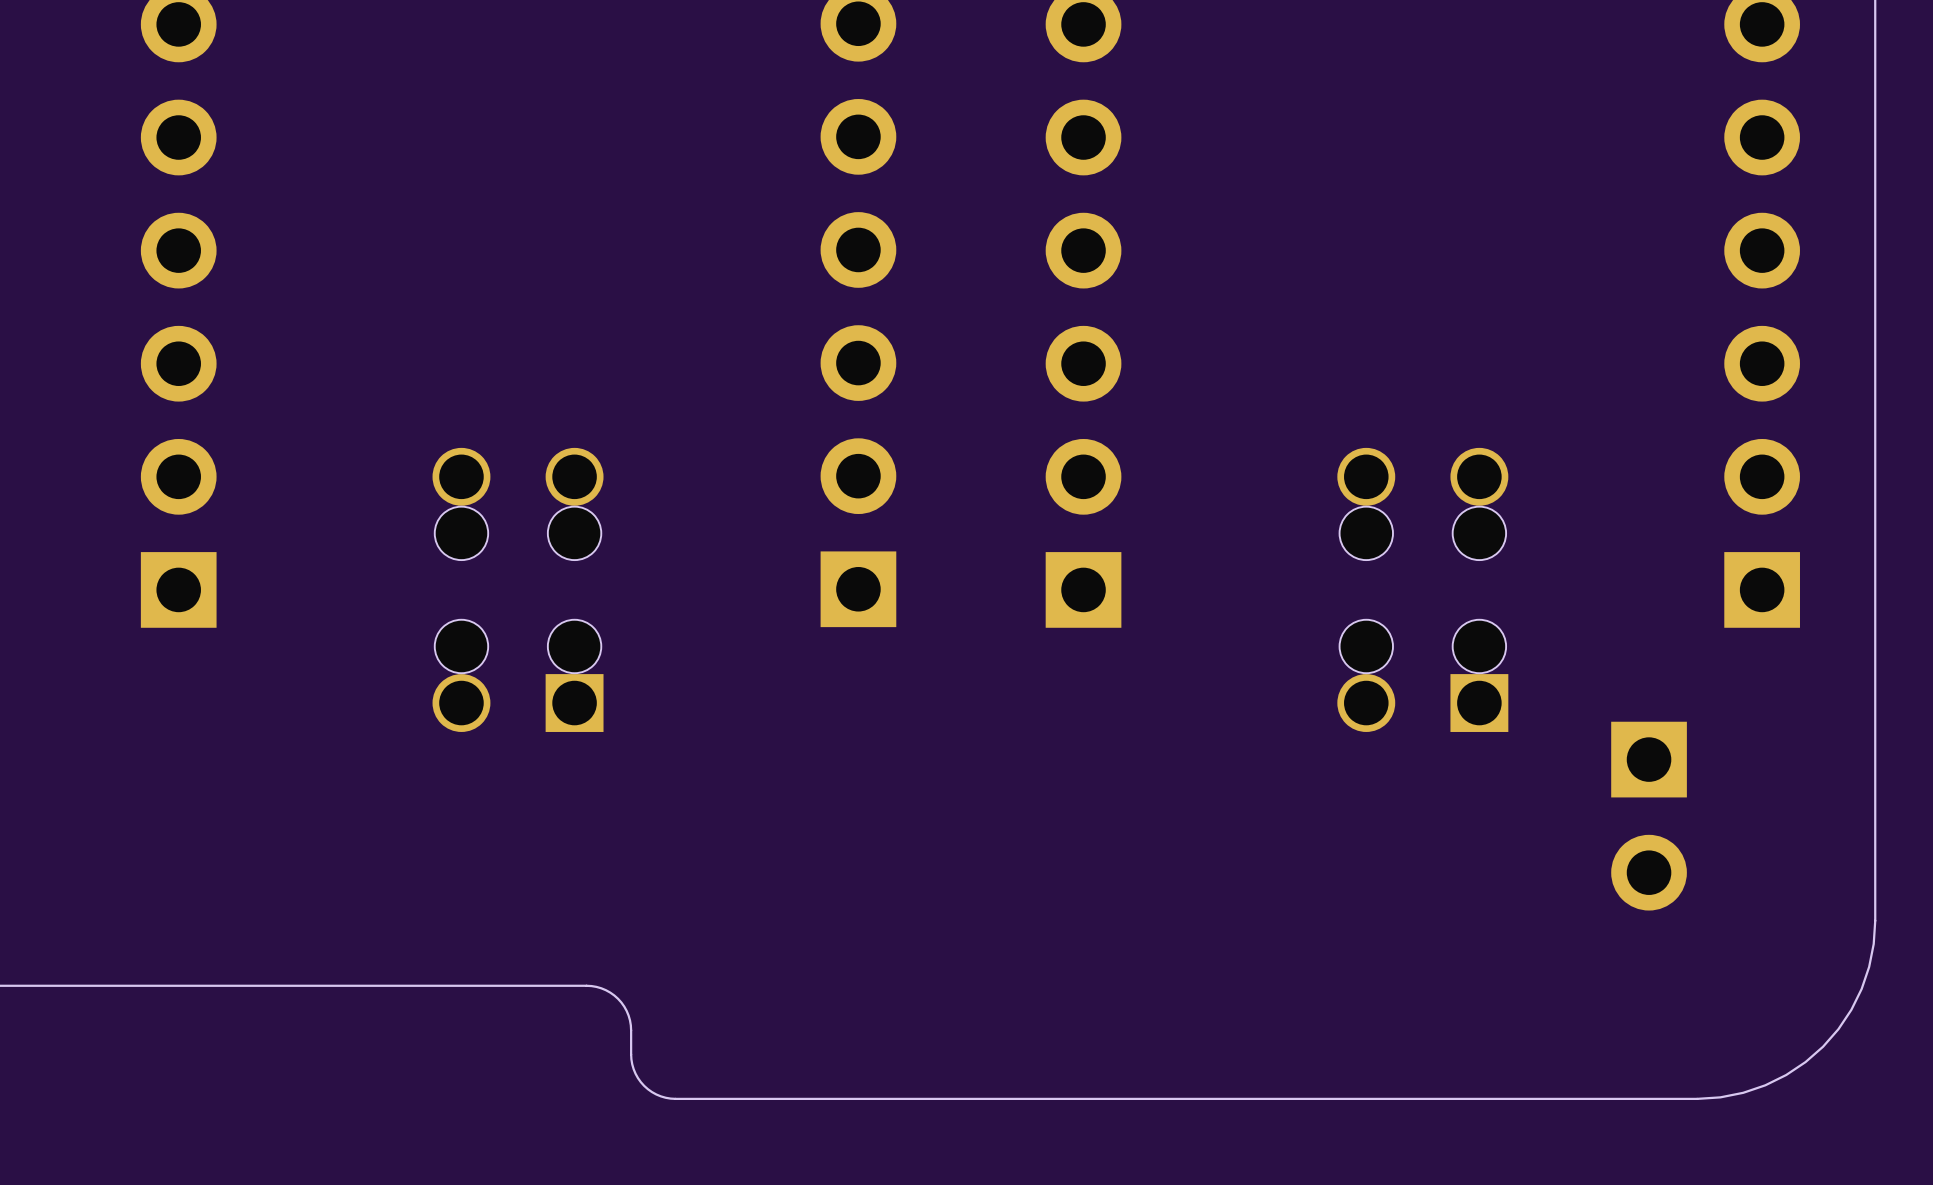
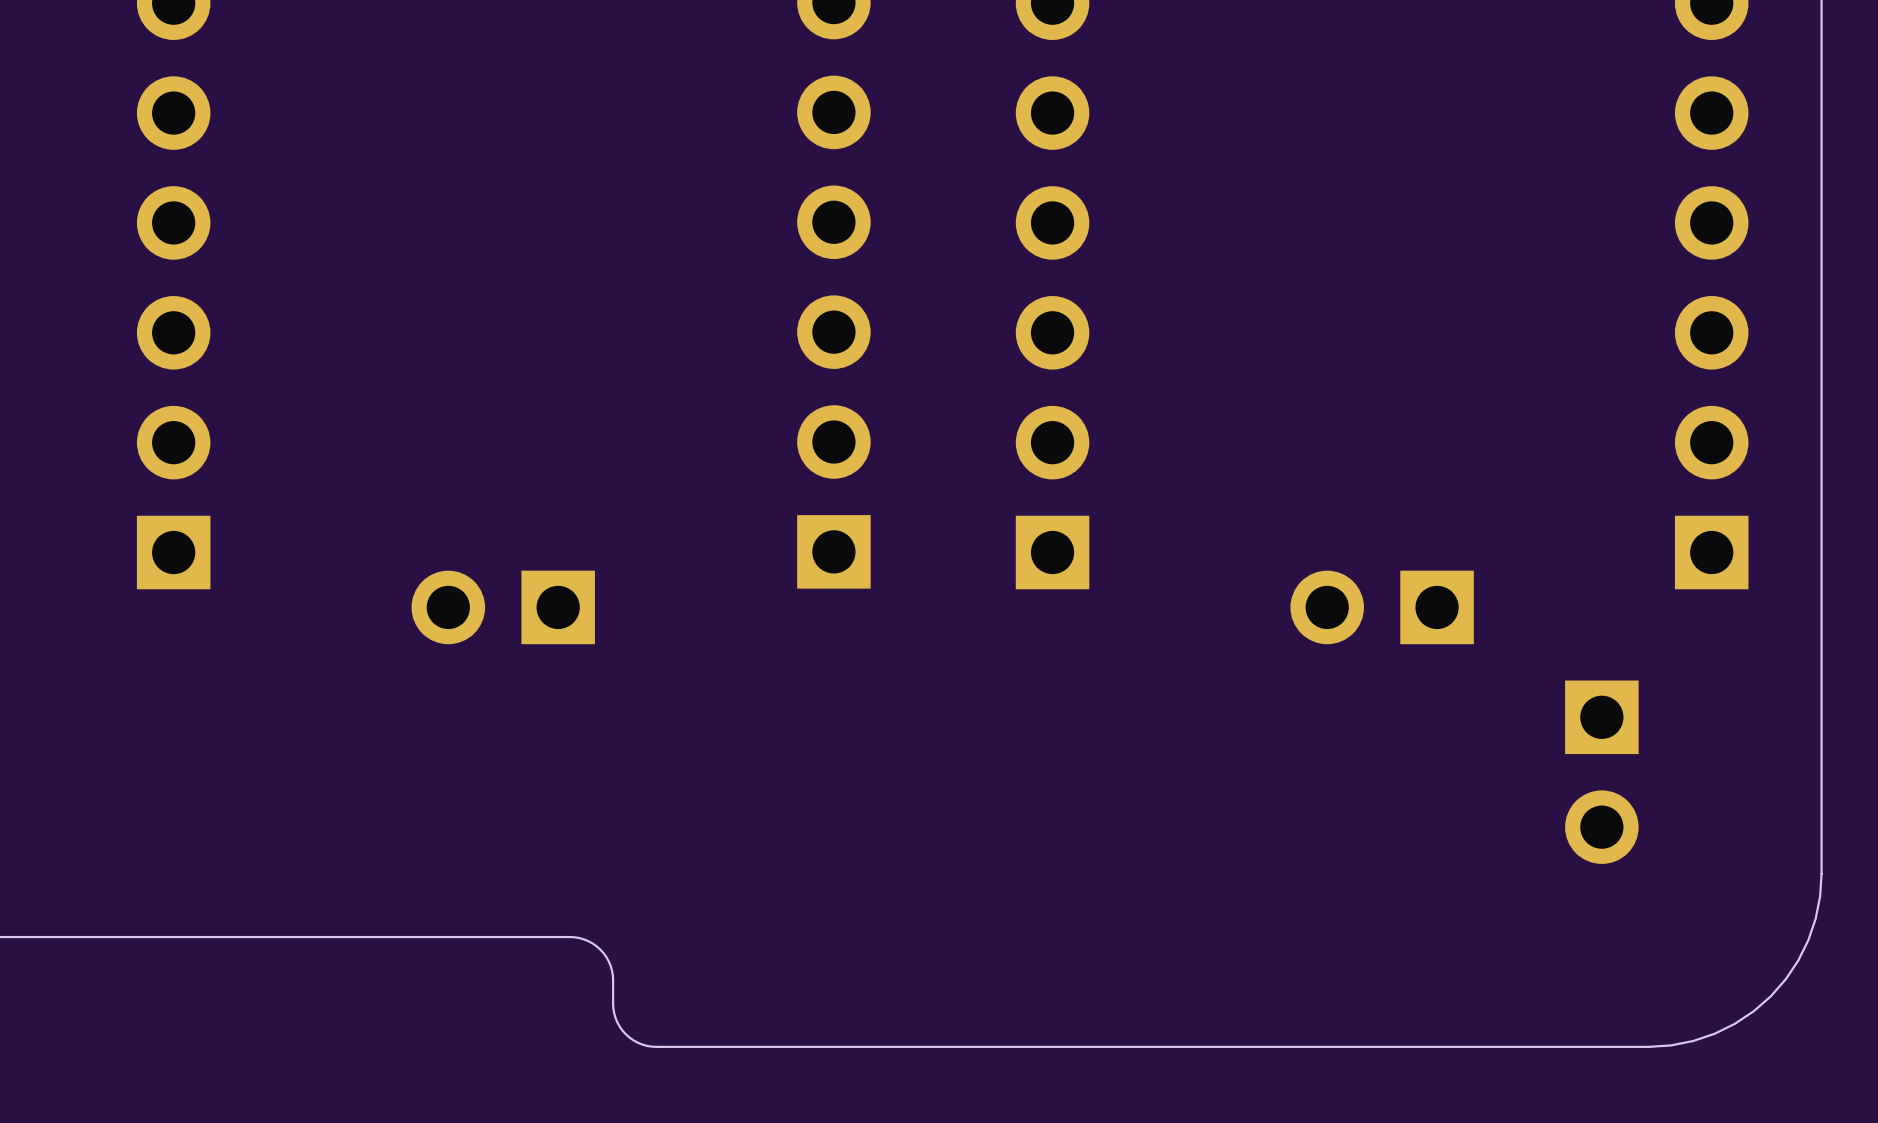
part: (518, 589) -> none
part: (1422, 589) -> none
part: none -> (503, 607)
part: none -> (1382, 607)

